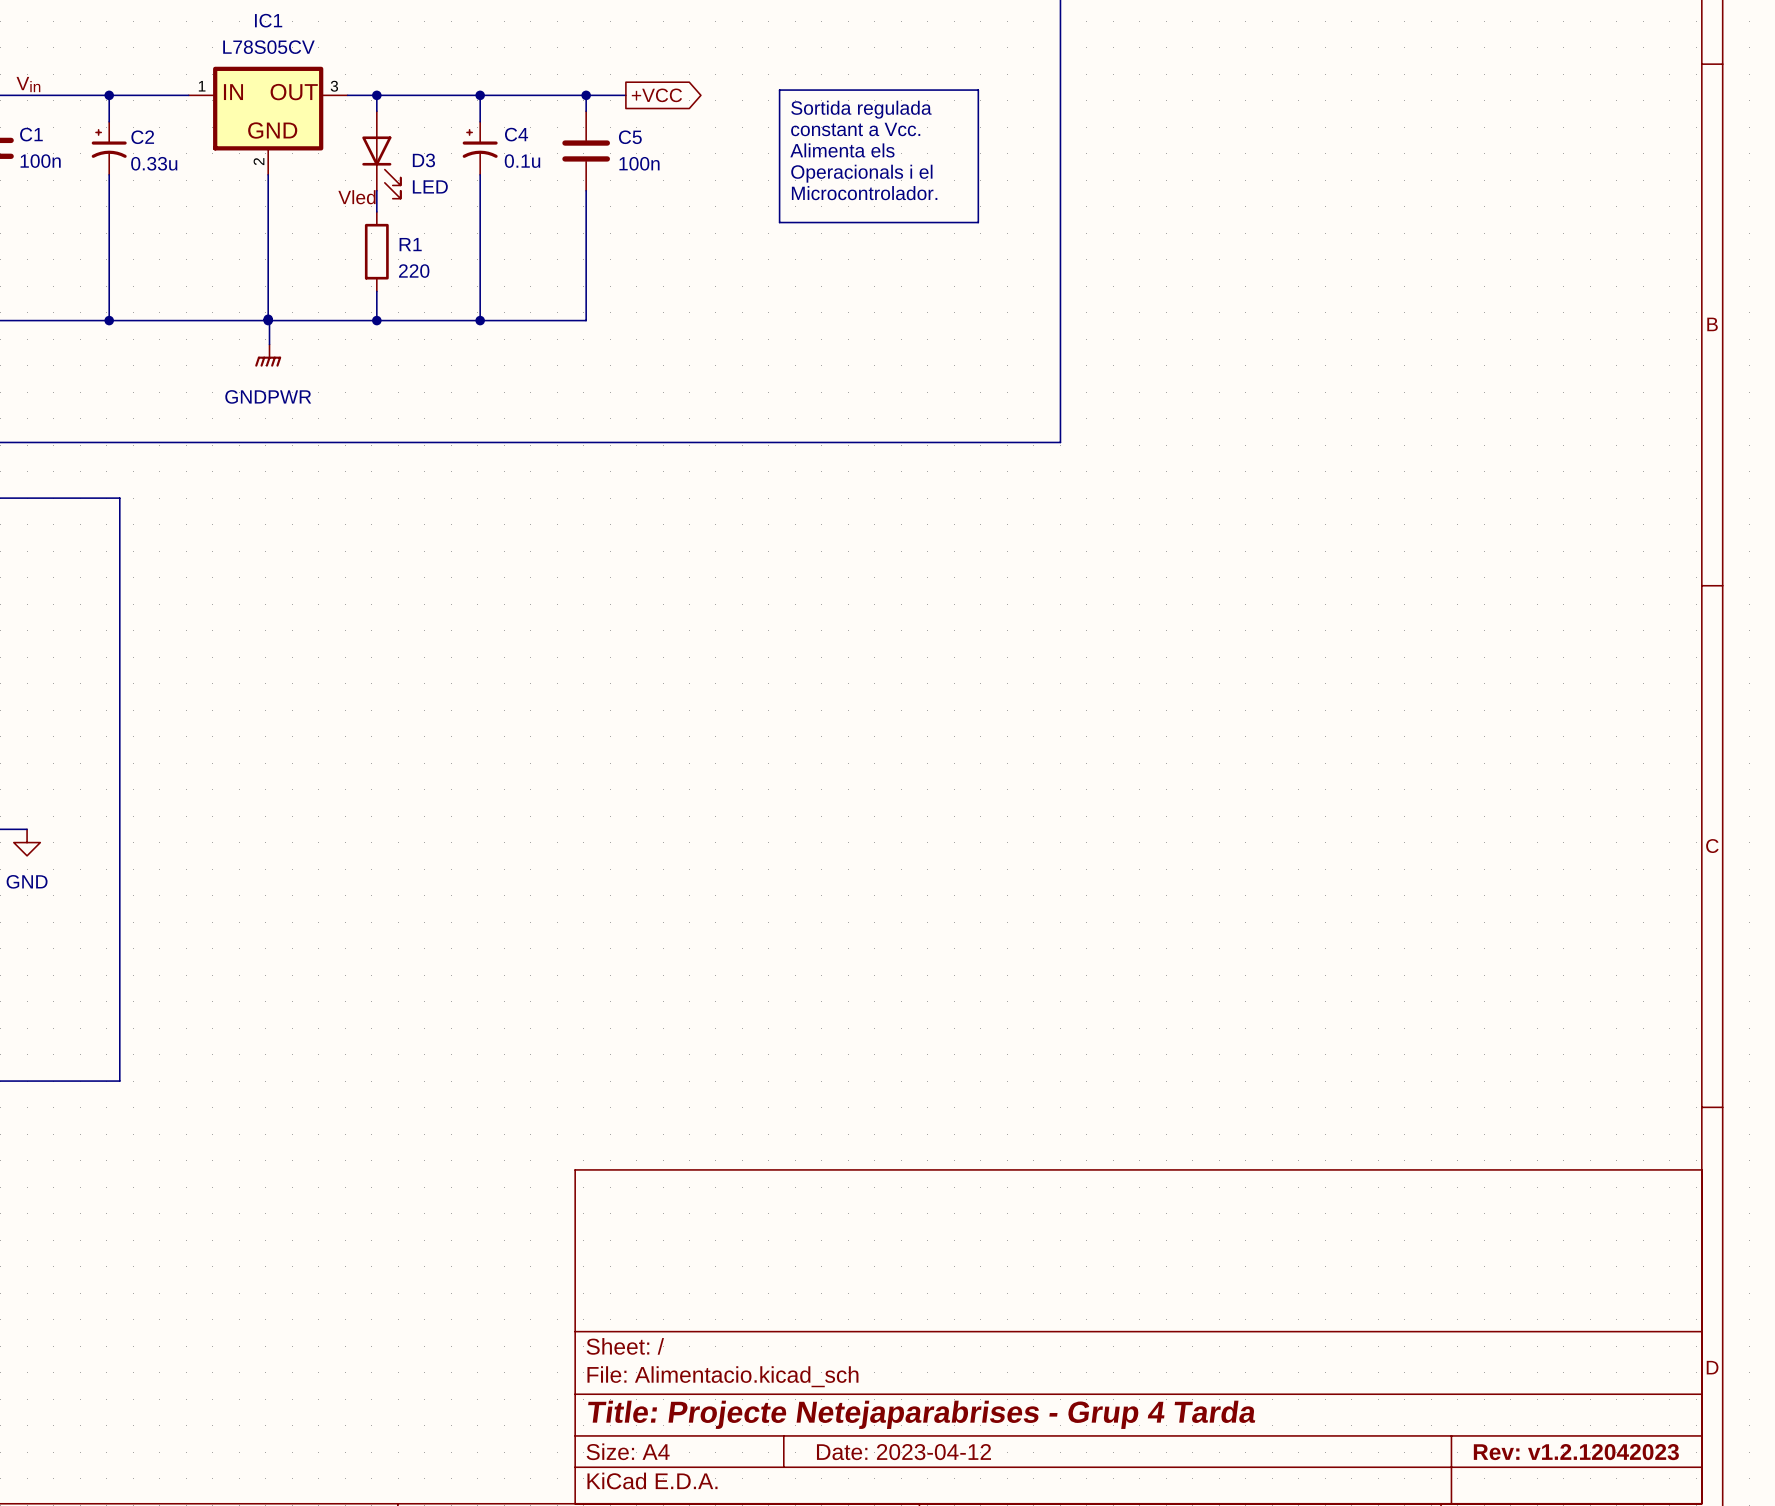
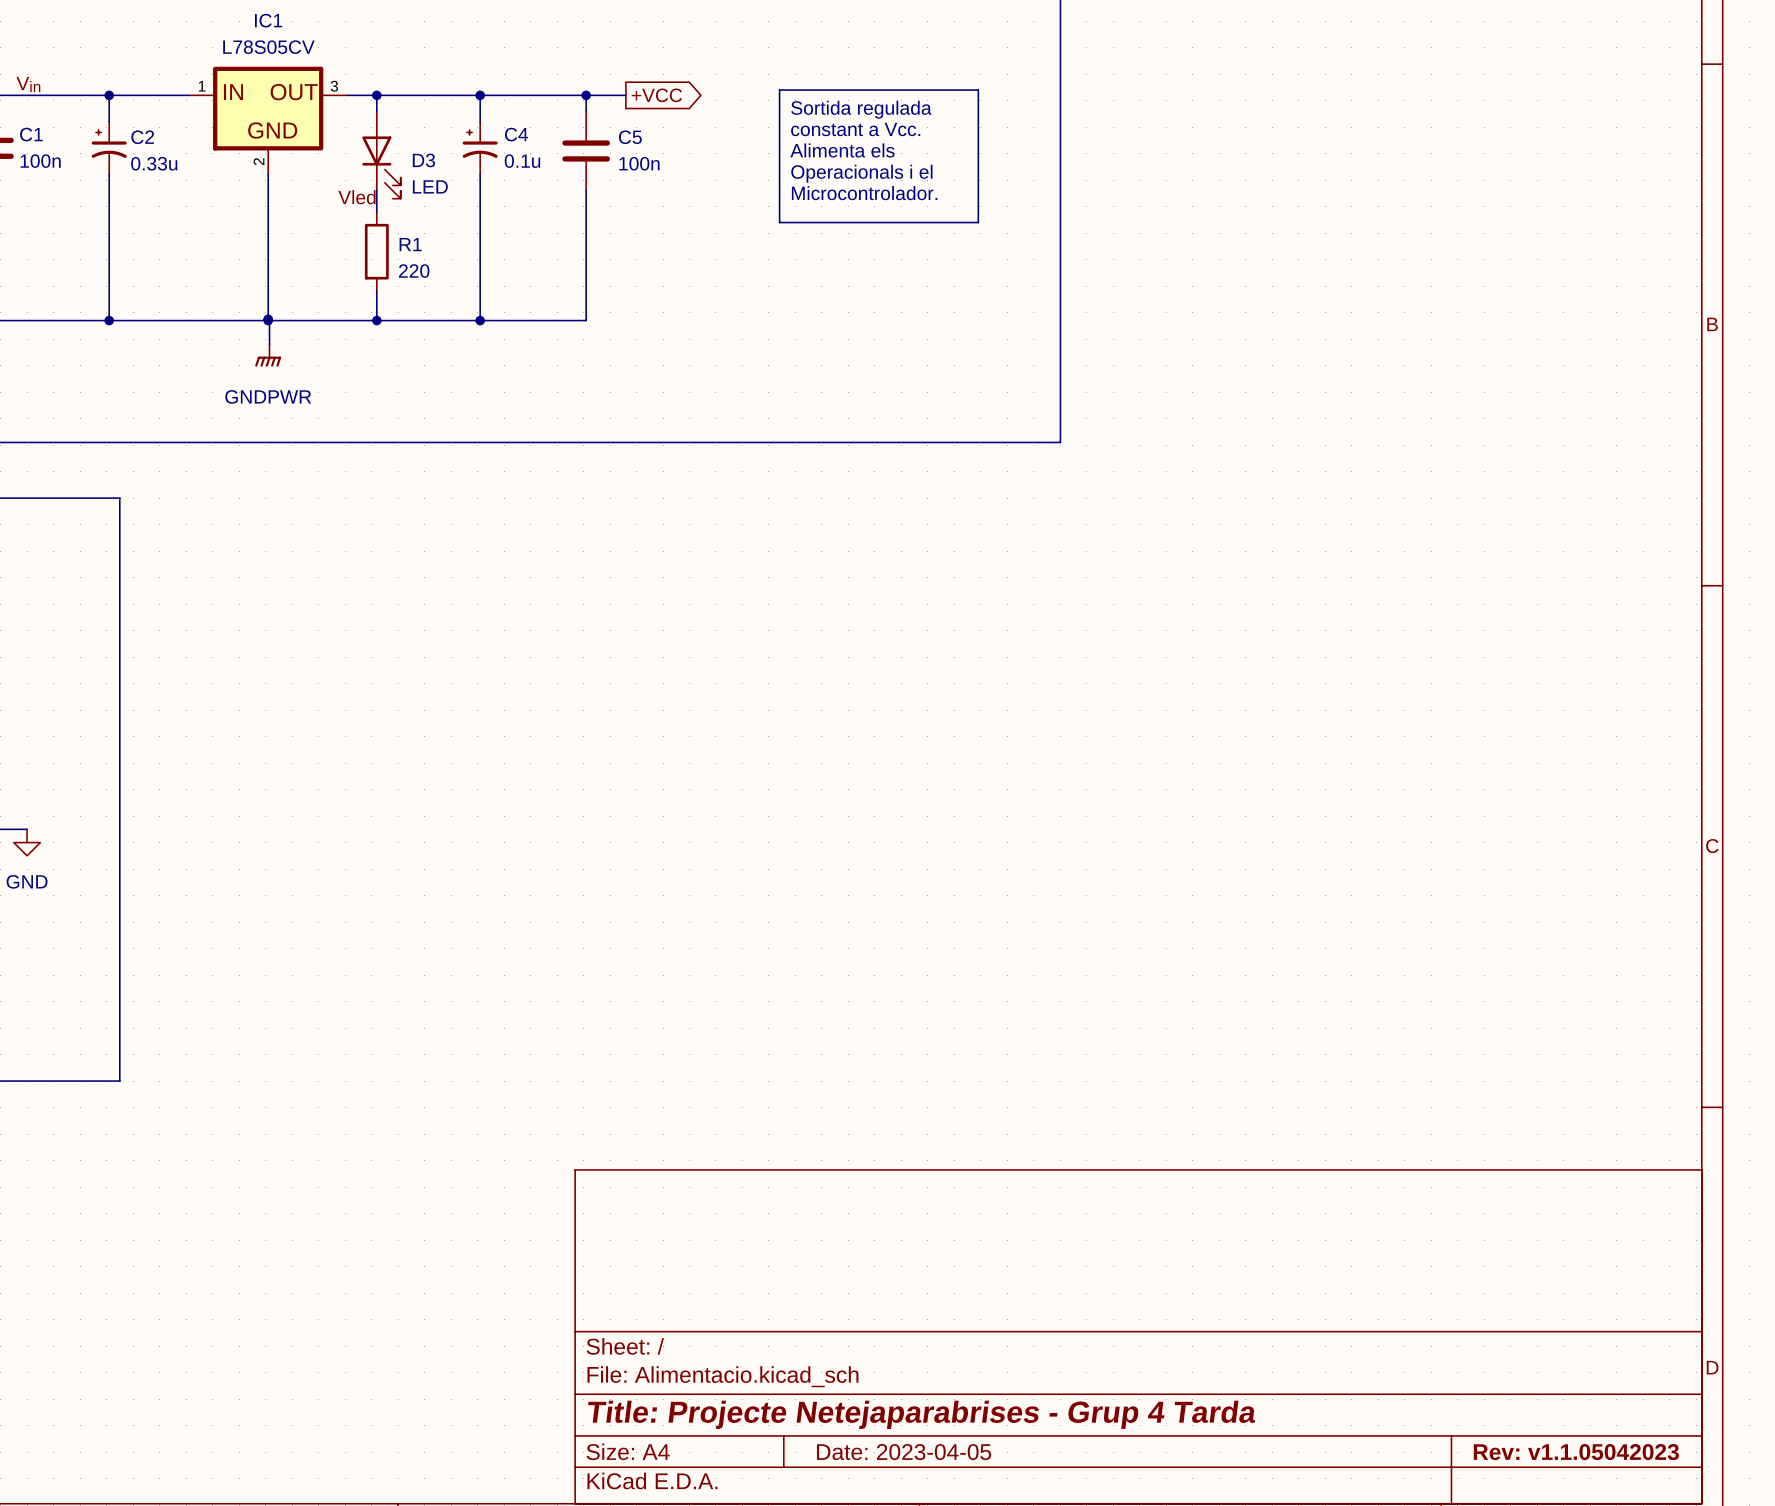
title block: Date: 2023-04-12 (903, 1452) -> Date: 2023-04-05 (904, 1452)
title block: Rev: v1.2.12042023 (1576, 1452) -> Rev: v1.1.05042023 (1576, 1452)

